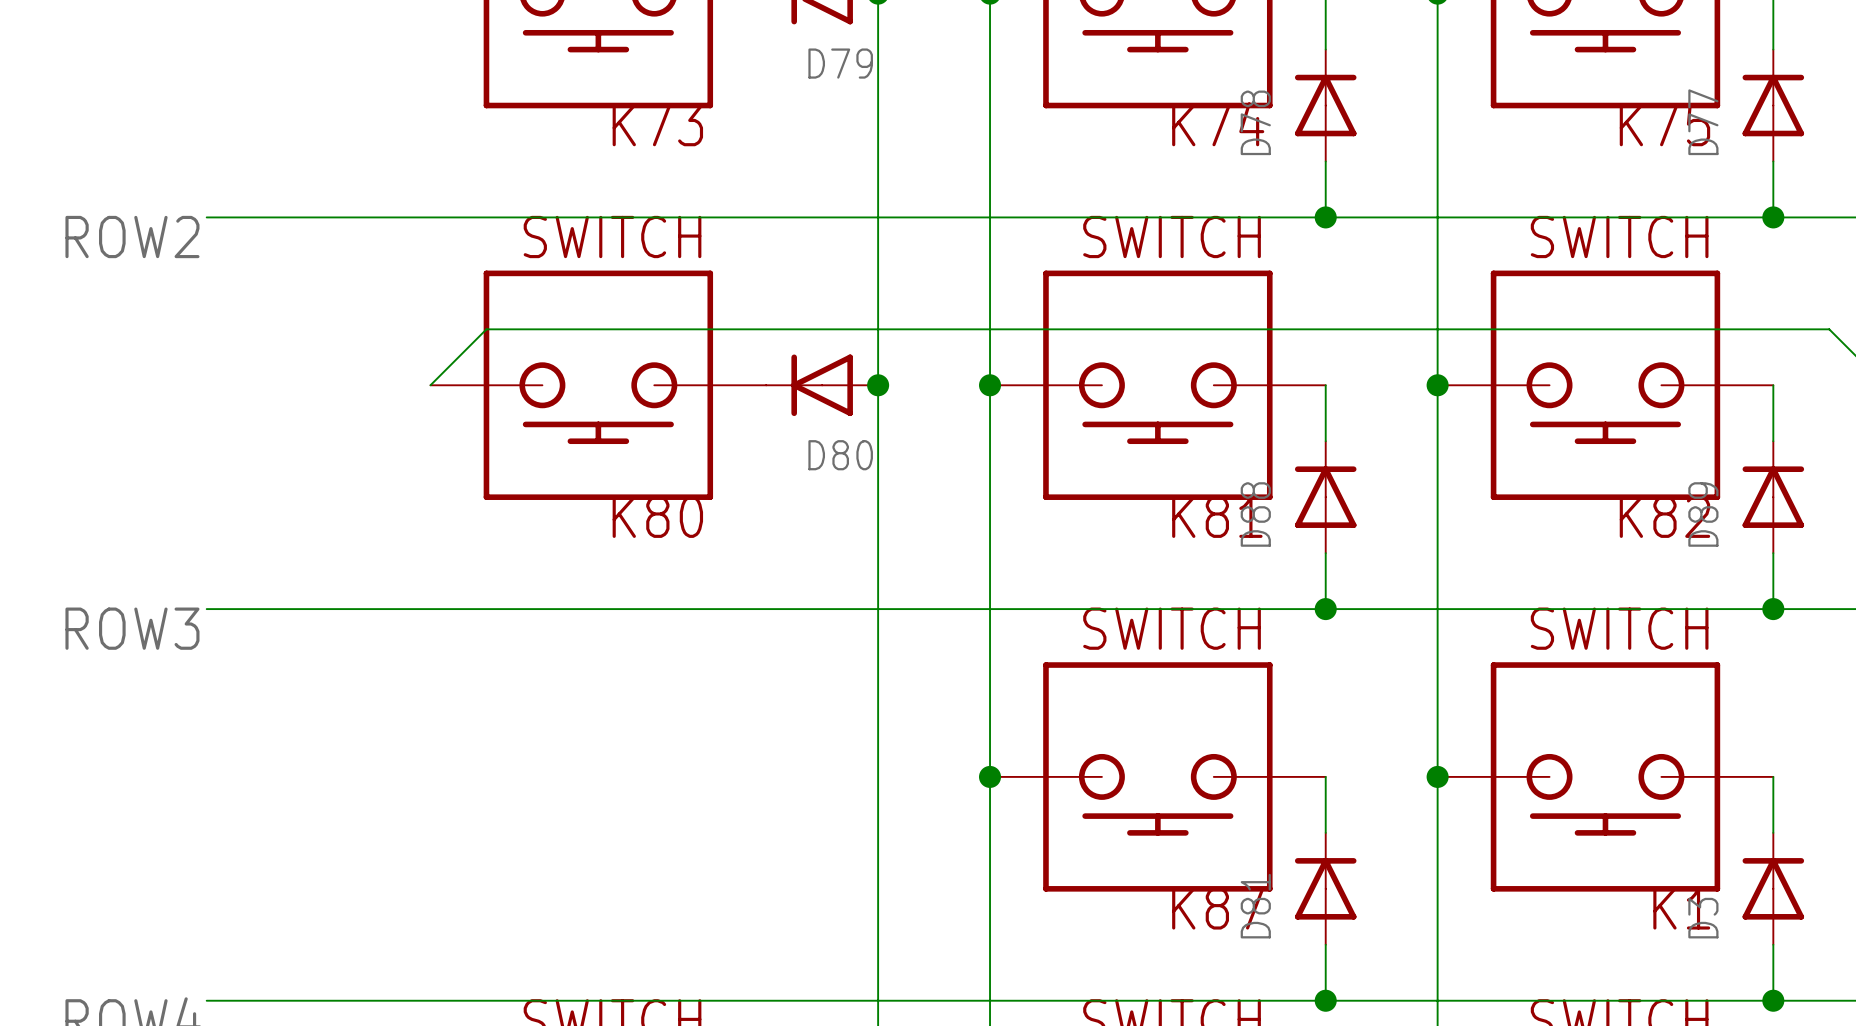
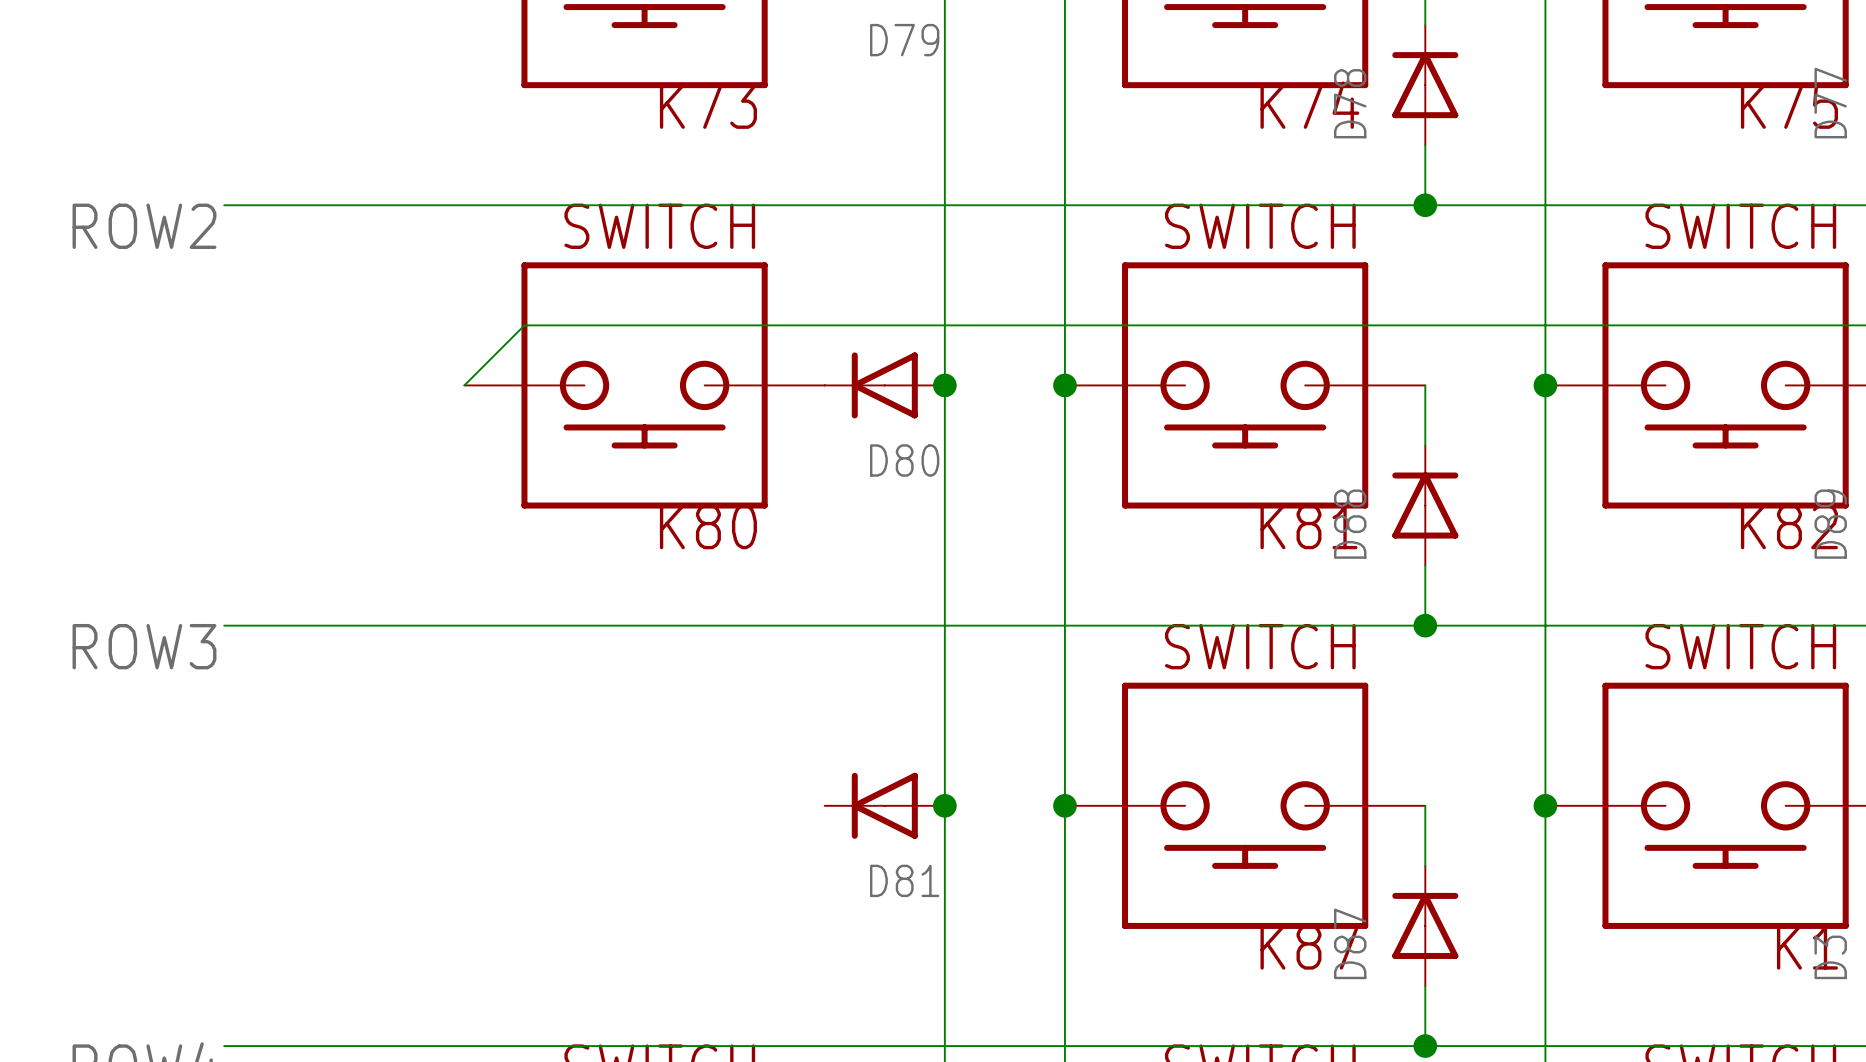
D81: none -> (884, 805)
junction: none -> (944, 805)
D81 name: D81 (1255, 906) -> D87 (1350, 943)

